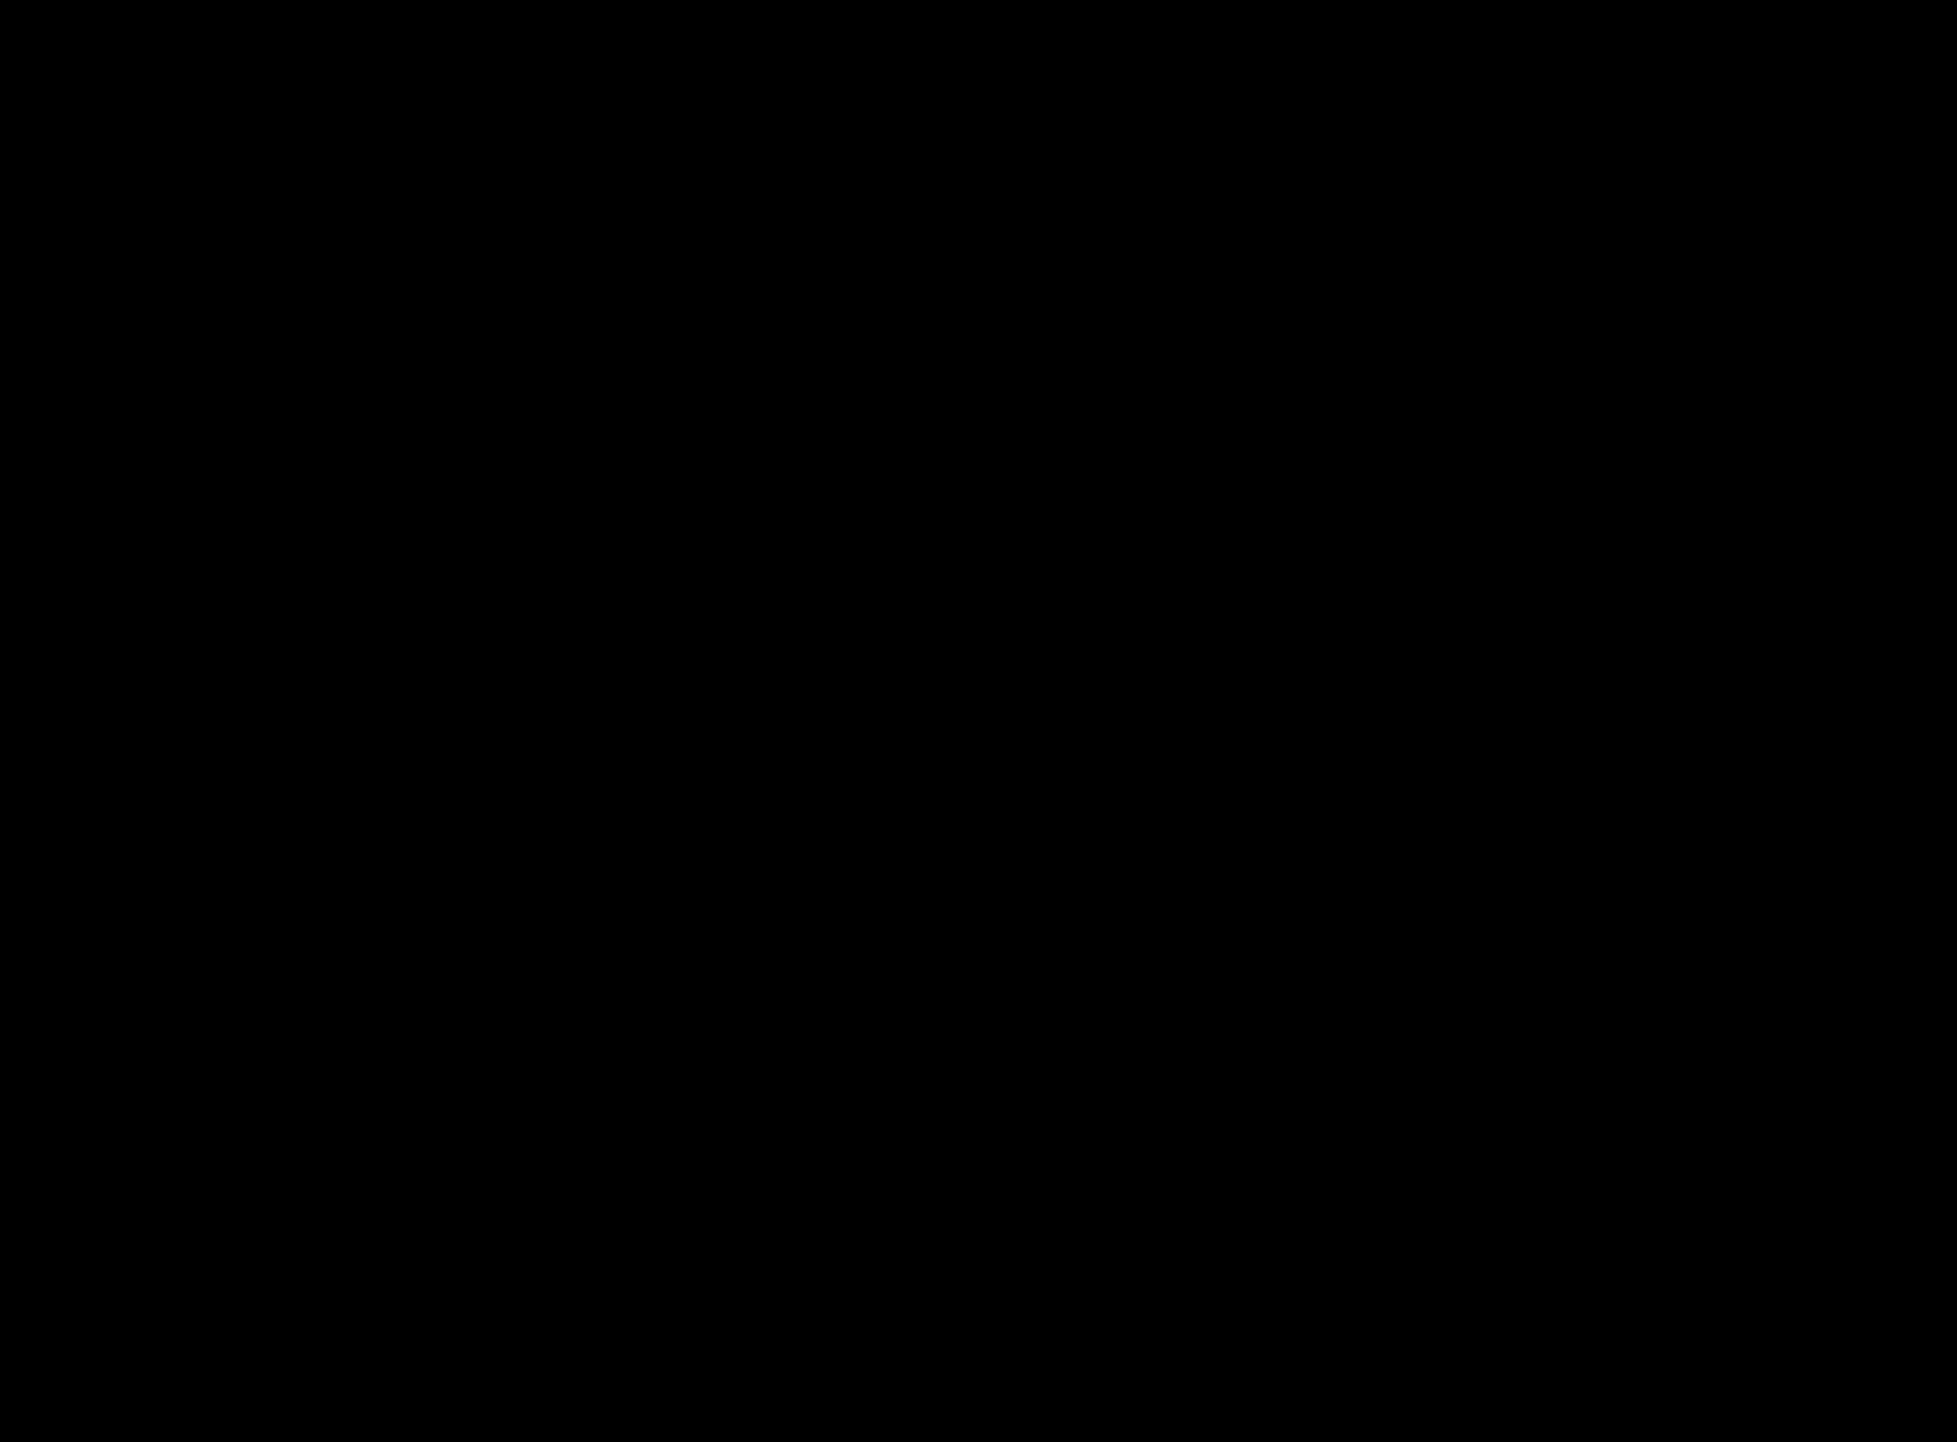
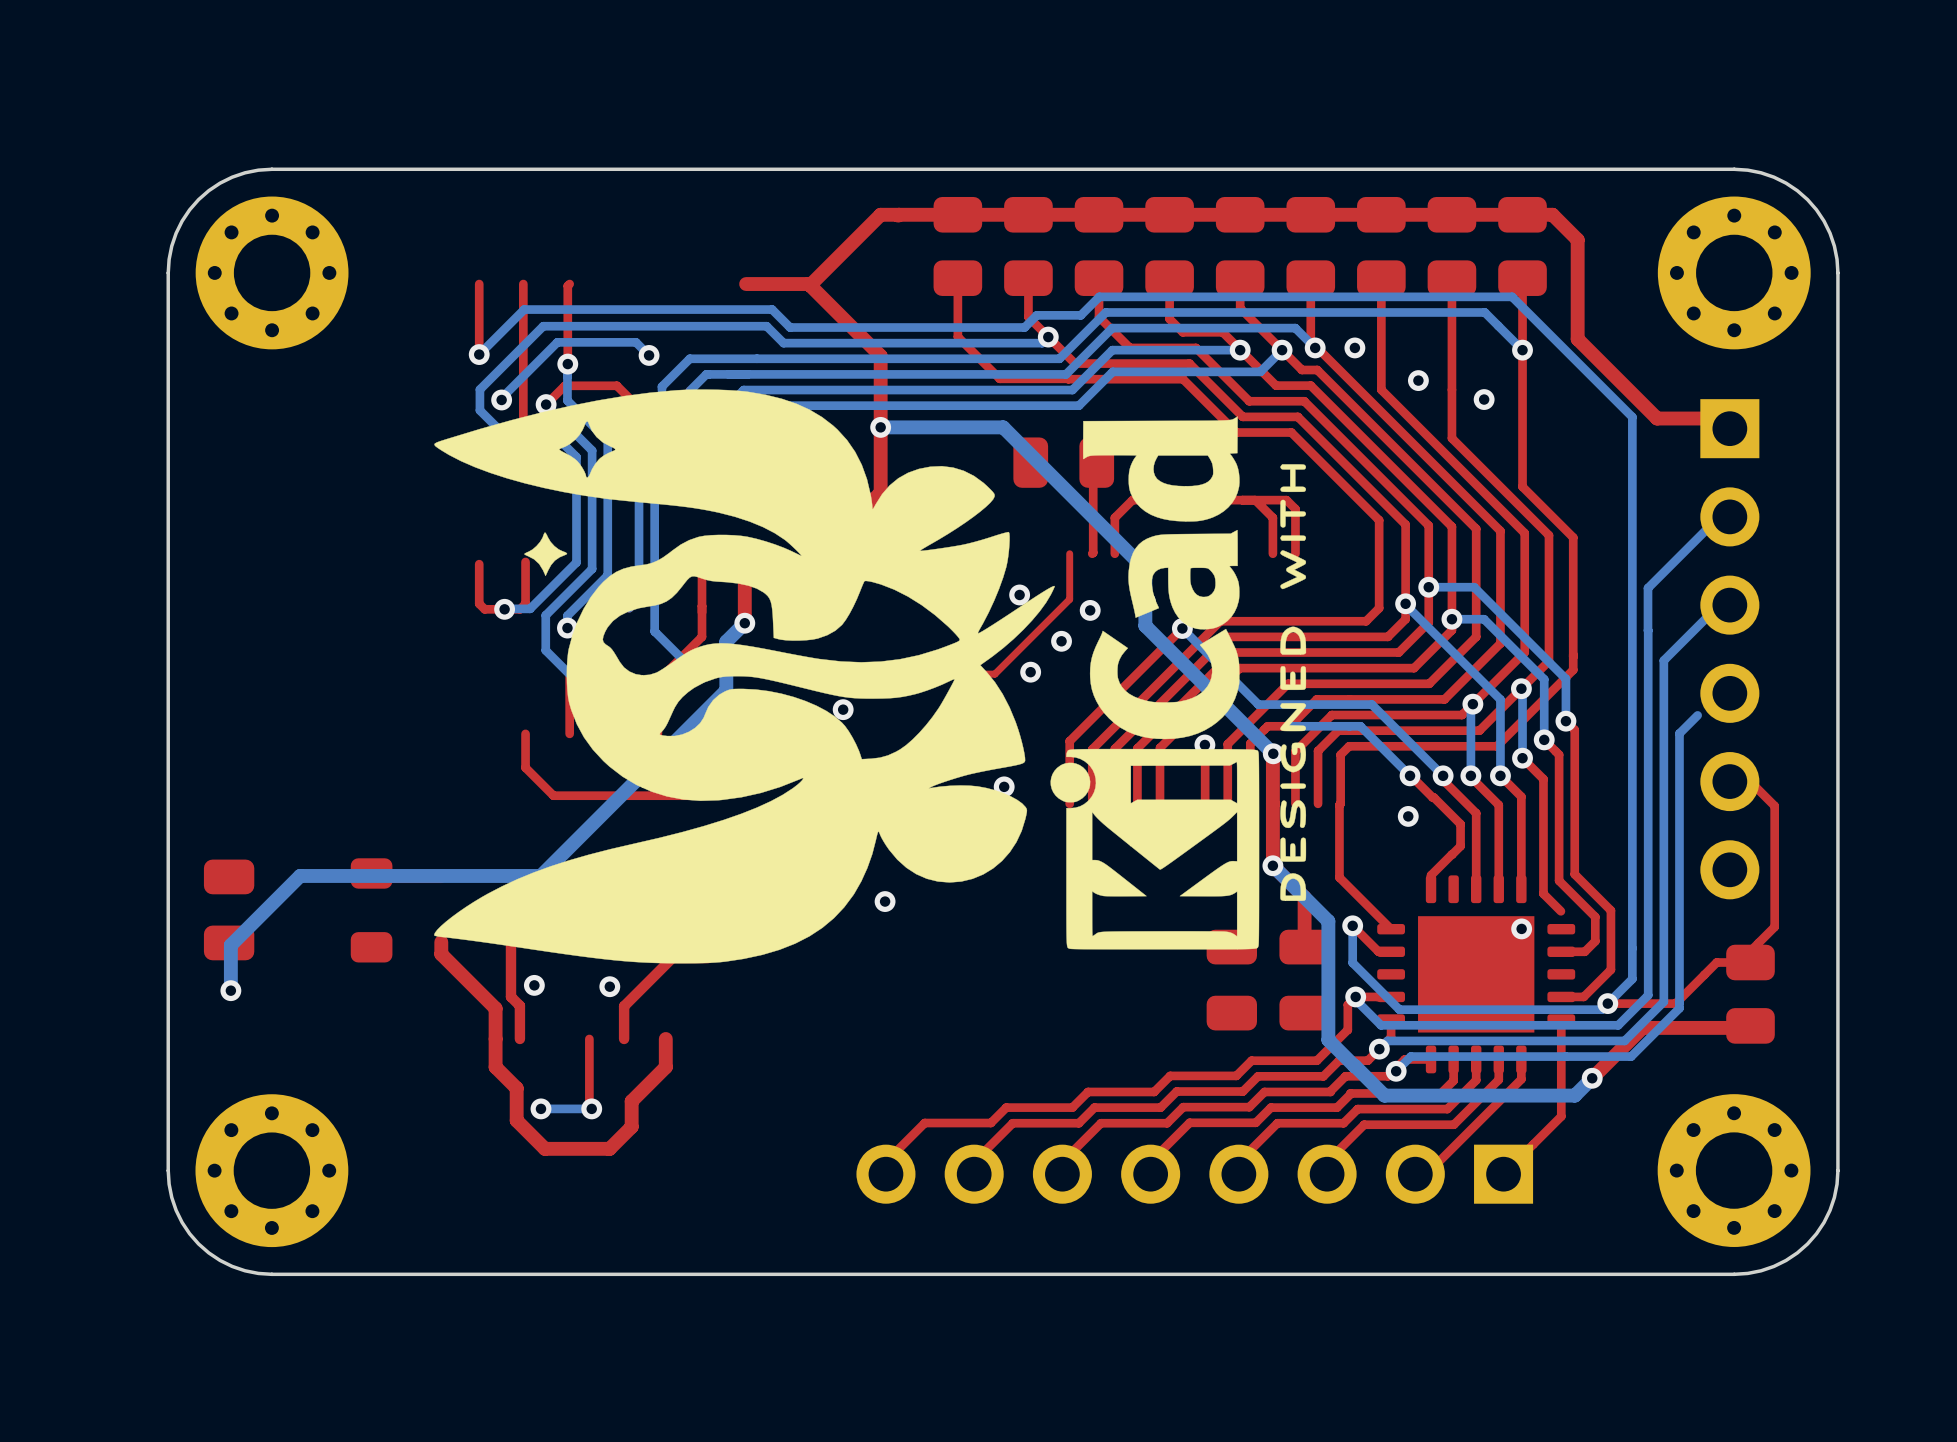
board edge: none -> (1734, 169) (271, 169) (245, 172) (232, 177) (208, 190) (189, 209) (176, 233) (169, 259) (168, 272) (168, 1170) (169, 1184) (176, 1210) (189, 1233) (208, 1252) (220, 1260) (245, 1270) (271, 1274) (1734, 1274) (1761, 1270) (1786, 1260) (1797, 1252) (1816, 1233) (1824, 1222) (1834, 1197) (1837, 1170) (1837, 272) (1837, 259) (1830, 233) (1824, 221) (1807, 199) (1797, 190) (1773, 177) (1761, 172) (1734, 169)
part: none -> (957, 246)
part: none -> (1028, 246)
part: none -> (1099, 246)
part: none -> (1169, 246)
part: none -> (1240, 246)
part: none -> (1310, 246)
part: none -> (1381, 246)
part: none -> (1451, 246)
part: none -> (1522, 246)
part: none -> (272, 272)
part: none -> (1734, 272)
top track: none -> (957, 278) (957, 336) (999, 378) (1068, 378)
top track: none -> (1028, 278) (1028, 317) (1074, 363) (1189, 363) (1242, 416) (1297, 416) (1405, 524) (1405, 619) (1387, 636) (1226, 636) (1114, 748) (1114, 803)
top track: none -> (1099, 278) (1099, 317) (1129, 347) (1195, 347) (1249, 401) (1304, 401) (1428, 525) (1428, 622) (1398, 652) (1233, 652) (1137, 748) (1137, 803)
top track: none -> (1169, 278) (1169, 319) (1182, 332) (1222, 332) (1276, 385) (1310, 385) (1451, 526) (1451, 630) (1414, 668) (1239, 668) (1160, 747) (1160, 803)
top track: none -> (1240, 278) (1240, 308) (1301, 369) (1317, 369) (1476, 528) (1476, 636) (1429, 683) (1288, 683) (1227, 744) (1227, 803)
top track: none -> (1310, 278) (1310, 341) (1500, 531) (1500, 643) (1444, 699) (1316, 699) (1289, 726) (1267, 726) (1250, 743) (1250, 803)
top track: none -> (1381, 278) (1381, 389) (1524, 533) (1524, 652) (1462, 715) (1331, 715) (1295, 751) (1295, 803)
top track: none -> (1451, 278) (1451, 438) (1548, 535) (1548, 661) (1479, 730) (1338, 730) (1318, 750) (1318, 803)
top track: none -> (1522, 278) (1522, 486) (1573, 537) (1573, 669) (1496, 746) (1349, 746) (1340, 754) (1339, 877) (1391, 929)
top track: none -> (479, 284) (479, 354)
top track: none -> (523, 284) (523, 455) (525, 453)
top track: none -> (569, 284) (567, 285) (567, 364)
top track: none -> (746, 284) (808, 284) (880, 355) (880, 492) (810, 563) (746, 561) (744, 623)
top track: none -> (810, 285) (880, 214) (1552, 214) (1577, 239) (1577, 339) (1657, 418) (1729, 418)
bottom track: none -> (1048, 337) (1042, 343) (783, 343) (766, 326) (543, 326) (479, 389) (479, 410) (500, 430) (550, 430) (576, 457) (576, 562) (530, 608) (505, 608)
via: none -> (1048, 337)
bottom track: none -> (1315, 347) (1295, 328) (1112, 328) (1065, 374) (706, 374) (689, 390)
via: none -> (1315, 347)
via: none -> (1354, 347)
bottom track: none -> (1240, 350) (1112, 350) (1072, 390) (743, 390) (738, 395) (718, 395) (701, 412) (654, 412) (639, 428) (639, 598) (629, 608)
via: none -> (1240, 350)
bottom track: none -> (1282, 350) (1260, 371) (1112, 371) (1078, 405) (750, 405) (744, 410) (725, 410) (707, 428) (676, 428) (654, 450) (654, 631) (702, 678)
via: none -> (1282, 350)
bottom track: none -> (1522, 350) (1484, 312) (1105, 312) (1059, 358) (689, 358) (661, 386) (661, 390)
via: none -> (1522, 350)
bottom track: none -> (479, 354) (524, 309) (772, 309) (790, 327) (1024, 327) (1036, 315) (1080, 315) (1099, 296) (1512, 296) (1632, 417) (1632, 979) (1601, 1009) (1399, 1009) (1352, 962) (1352, 925)
via: none -> (479, 354)
bottom track: none -> (649, 355) (635, 342) (557, 342) (501, 399)
via: none -> (649, 355)
bottom track: none -> (567, 364) (567, 400) (607, 440) (607, 575) (567, 615) (567, 628)
via: none -> (567, 364)
top track: none -> (1068, 379) (1183, 379) (1236, 432) (1291, 432) (1379, 520) (1379, 608) (1366, 621) (1220, 621) (1092, 749) (1092, 803)
via: none -> (1418, 380)
drawing: none -> [433, 389, 1307, 964]
via: none -> (501, 399)
via: none -> (1484, 399)
top track: none -> (546, 404) (564, 385) (616, 385) (657, 426) (657, 455)
bottom track: none -> (546, 404) (592, 450) (592, 568) (545, 615) (545, 650) (569, 674)
via: none -> (546, 404)
bottom track: none -> (880, 427) (1003, 427) (1145, 569) (1145, 625) (1273, 753)
via: none -> (880, 427)
part: none -> (1063, 462)
top track: none -> (1093, 471) (1092, 553)
top track: none -> (1255, 500) (1272, 517) (1272, 553)
bottom track: none -> (1729, 506) (1647, 588) (1648, 995) (1618, 1025) (1381, 1025) (1355, 999) (1355, 996)
top track: none -> (1069, 553) (1069, 599) (994, 674) (971, 674) (956, 689) (956, 736)
top track: none -> (1295, 553) (1295, 509) (1286, 500) (1132, 500) (1114, 517) (1114, 553)
top track: none -> (525, 561) (525, 603) (520, 609) (484, 609) (479, 603) (479, 564)
top track: none -> (702, 561) (702, 636) (657, 680) (657, 733)
bottom track: none -> (1428, 587) (1474, 587) (1565, 679) (1565, 721)
via: none -> (1428, 587)
via: none -> (1019, 594)
bottom track: none -> (1729, 594) (1663, 660) (1663, 1001) (1624, 1040) (1387, 1040) (1379, 1049)
bottom track: none -> (1405, 603) (1500, 699) (1500, 775)
via: none -> (1405, 603)
via: none -> (504, 609)
via: none -> (1090, 610)
bottom track: none -> (1451, 619) (1484, 619) (1544, 679) (1544, 739)
via: none -> (1451, 619)
bottom track: none -> (744, 623) (726, 641) (726, 690) (540, 875) (300, 875) (230, 945) (230, 990)
via: none -> (744, 623)
via: none -> (567, 628)
top track: none -> (1182, 628) (1069, 741) (1069, 803)
bottom track: none -> (1182, 628) (1258, 704) (1371, 704) (1443, 775)
via: none -> (1182, 628)
via: none -> (1061, 641)
part: none -> (1729, 649)
via: none -> (1030, 672)
top track: none -> (569, 674) (569, 733)
bottom track: none -> (1521, 688) (1522, 758)
via: none -> (1521, 688)
bottom track: none -> (1472, 704) (1470, 706) (1470, 775)
via: none -> (1472, 704)
via: none -> (843, 709)
bottom track: none -> (1697, 715) (1679, 733) (1679, 1008) (1631, 1056) (1410, 1056) (1396, 1071)
top track: none -> (1565, 721) (1574, 729) (1574, 874) (1610, 910) (1610, 969) (1583, 996) (1561, 996)
via: none -> (1565, 721)
bottom track: none -> (1289, 726) (1360, 726) (1410, 775)
top track: none -> (746, 733) (746, 767) (718, 795) (553, 795) (525, 767) (525, 733)
top track: none -> (1544, 739) (1559, 754) (1559, 880) (1595, 917) (1595, 941) (1584, 951) (1561, 951)
via: none -> (1544, 739)
via: none -> (1204, 744)
top track: none -> (1205, 745) (1205, 803)
via: none -> (1273, 753)
top track: none -> (1272, 754) (1272, 865) (1304, 897) (1304, 948) (1297, 941)
top track: none -> (1522, 758) (1543, 779) (1543, 893) (1560, 911)
via: none -> (1522, 758)
top track: none -> (1410, 775) (1460, 824) (1460, 846) (1431, 875) (1431, 889)
via: none -> (1410, 775)
top track: none -> (1443, 775) (1443, 780) (1476, 813) (1476, 889)
via: none -> (1443, 775)
top track: none -> (1470, 775) (1498, 805) (1498, 889)
via: none -> (1470, 775)
top track: none -> (1500, 775) (1521, 796) (1521, 889)
via: none -> (1500, 775)
top track: none -> (1752, 784) (1774, 806) (1774, 926) (1750, 951)
via: none -> (1004, 786)
via: none -> (1408, 816)
bottom track: none -> (1272, 865) (1328, 921) (1328, 1040) (1354, 1066)
via: none -> (1272, 865)
via: none -> (885, 901)
part: none -> (229, 909)
part: none -> (371, 910)
top track: none -> (1352, 925) (1378, 951) (1391, 951)
via: none -> (1352, 925)
via: none -> (1521, 928)
top track: none -> (510, 941) (510, 996) (519, 1005) (519, 1038)
top track: none -> (441, 942) (441, 954) (495, 1008) (495, 1067) (516, 1088) (516, 1120) (544, 1148) (609, 1148) (631, 1126) (631, 1101) (665, 1067) (665, 1038)
top track: none -> (708, 958) (672, 958) (624, 1006) (624, 1038)
top track: none -> (1750, 962) (1716, 962) (1675, 1003) (1607, 1003)
part: none -> (1476, 974)
part: none -> (1231, 980)
part: none -> (1304, 980)
via: none -> (534, 985)
via: none -> (609, 986)
via: none -> (230, 990)
part: none -> (1750, 994)
via: none -> (1355, 996)
top track: none -> (1391, 996) (1355, 996) (1347, 1004) (1347, 1029)
via: none -> (1607, 1003)
top track: none -> (1391, 1019) (1391, 1037) (1367, 1060) (1339, 1060) (1323, 1076) (1258, 1076) (1242, 1091) (1176, 1091) (1160, 1107) (1094, 1107) (1078, 1123) (1012, 1123) (962, 1173)
top track: none -> (1561, 1019) (1561, 1116) (1503, 1174)
top track: none -> (1750, 1025) (1748, 1027) (1642, 1027)
top track: none -> (1642, 1028) (1592, 1078)
top track: none -> (1347, 1029) (1316, 1060) (1251, 1060) (1236, 1075) (1170, 1075) (1154, 1091) (1088, 1091) (1072, 1107) (1006, 1107) (990, 1123) (924, 1123) (874, 1173)
top track: none -> (589, 1038) (589, 1106) (591, 1108)
via: none -> (1379, 1049)
top track: none -> (1431, 1059) (1404, 1059) (1387, 1076) (1345, 1076) (1330, 1091) (1264, 1091) (1249, 1107) (1183, 1107) (1167, 1123) (1101, 1123) (1050, 1173)
top track: none -> (1453, 1059) (1453, 1080) (1440, 1093) (1350, 1093) (1337, 1107) (1270, 1107) (1255, 1122) (1189, 1122) (1138, 1173)
top track: none -> (1476, 1059) (1476, 1080) (1447, 1109) (1357, 1109) (1343, 1123) (1277, 1123) (1226, 1173)
top track: none -> (1498, 1059) (1498, 1079) (1453, 1124) (1364, 1124) (1315, 1173)
top track: none -> (1521, 1059) (1521, 1079) (1426, 1174) (1415, 1174)
bottom track: none -> (1355, 1066) (1384, 1095) (1574, 1095) (1592, 1078)
via: none -> (1396, 1071)
via: none -> (1592, 1078)
via: none -> (540, 1108)
bottom track: none -> (591, 1108) (540, 1108)
via: none -> (591, 1108)
part: none -> (271, 1170)
part: none -> (1734, 1170)
part: none -> (1194, 1174)

